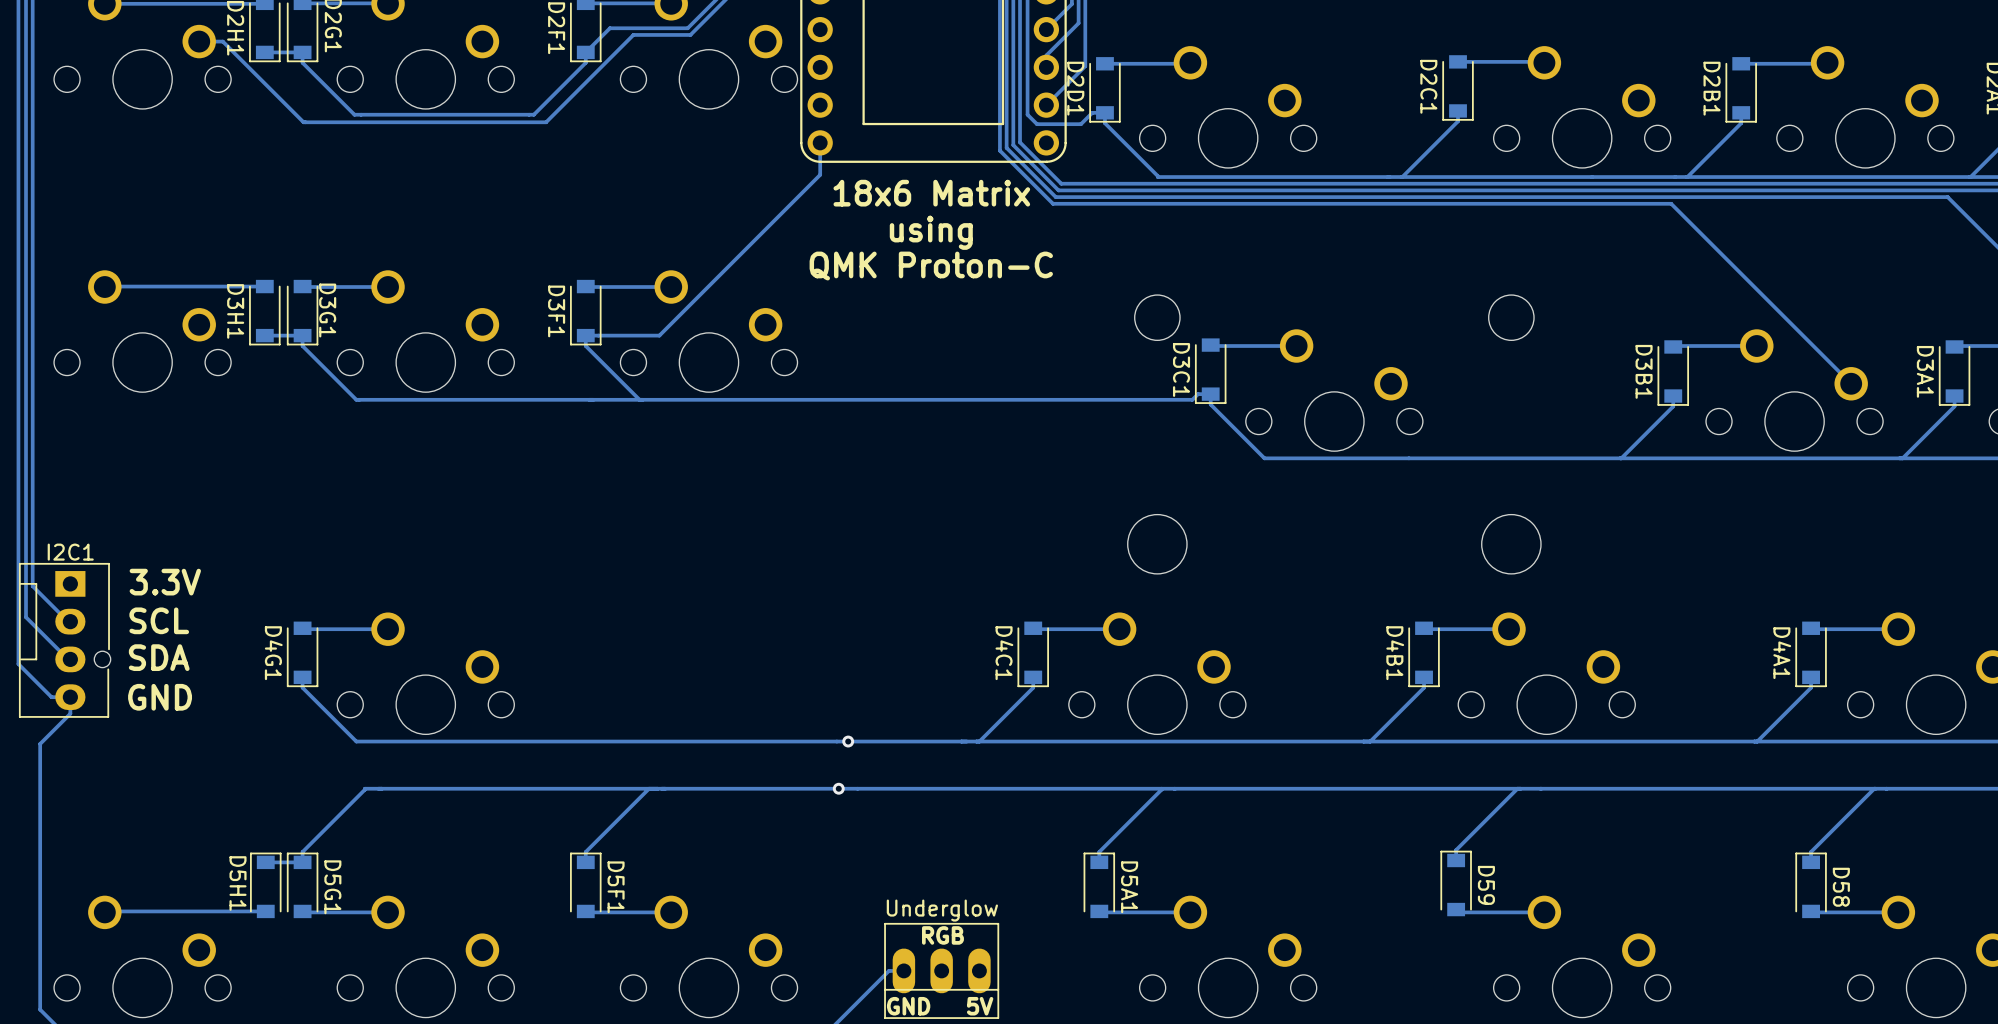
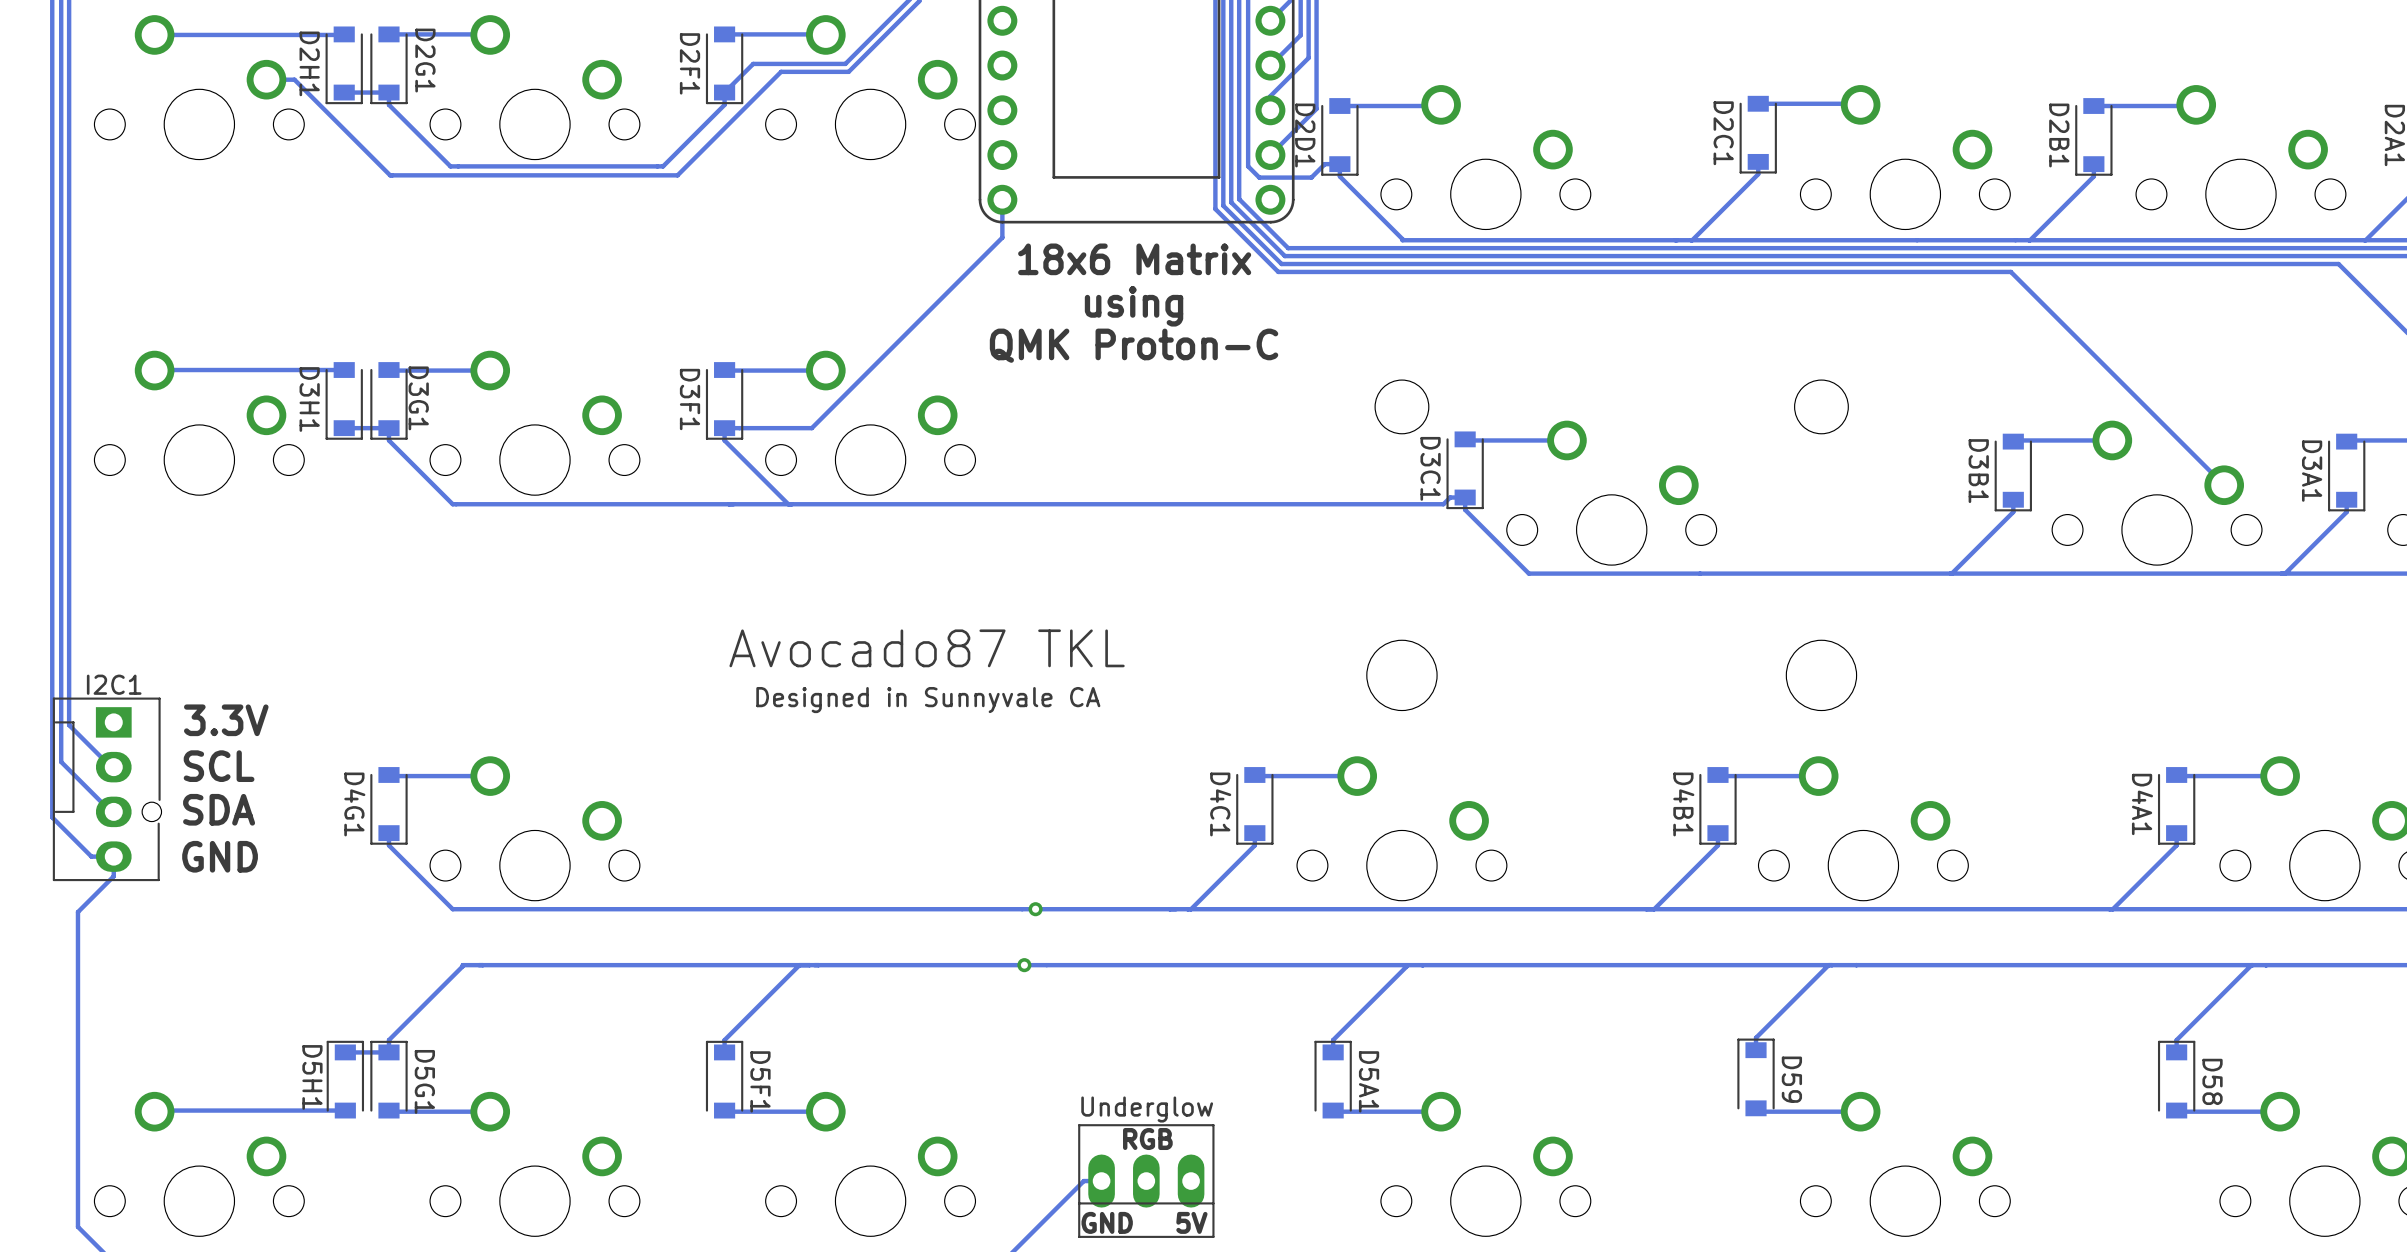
text: none -> Avocado87 TKL (927, 648)
text: none -> Designed in Sunnyvale CA (928, 700)

